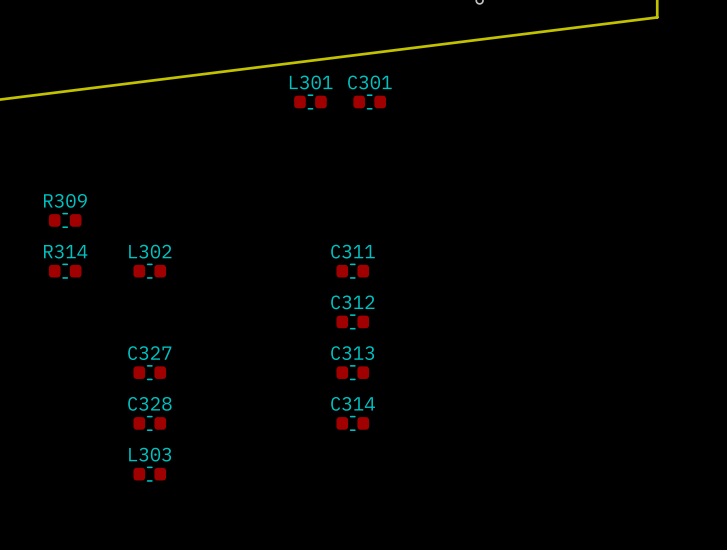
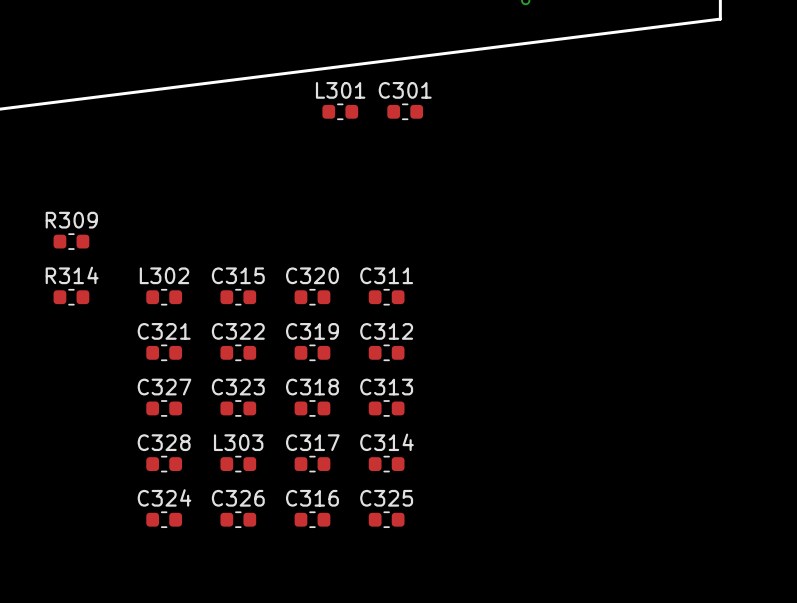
C315: none -> (238, 297)
C320: none -> (312, 297)
C321: none -> (164, 352)
C322: none -> (238, 352)
C319: none -> (312, 352)
C323: none -> (238, 408)
C318: none -> (312, 408)
L303: none -> (238, 464)
C317: none -> (312, 464)
L303 name: L303 (150, 454) -> C324 (164, 497)
C326: none -> (238, 519)
C316: none -> (312, 519)
C325: none -> (386, 519)

